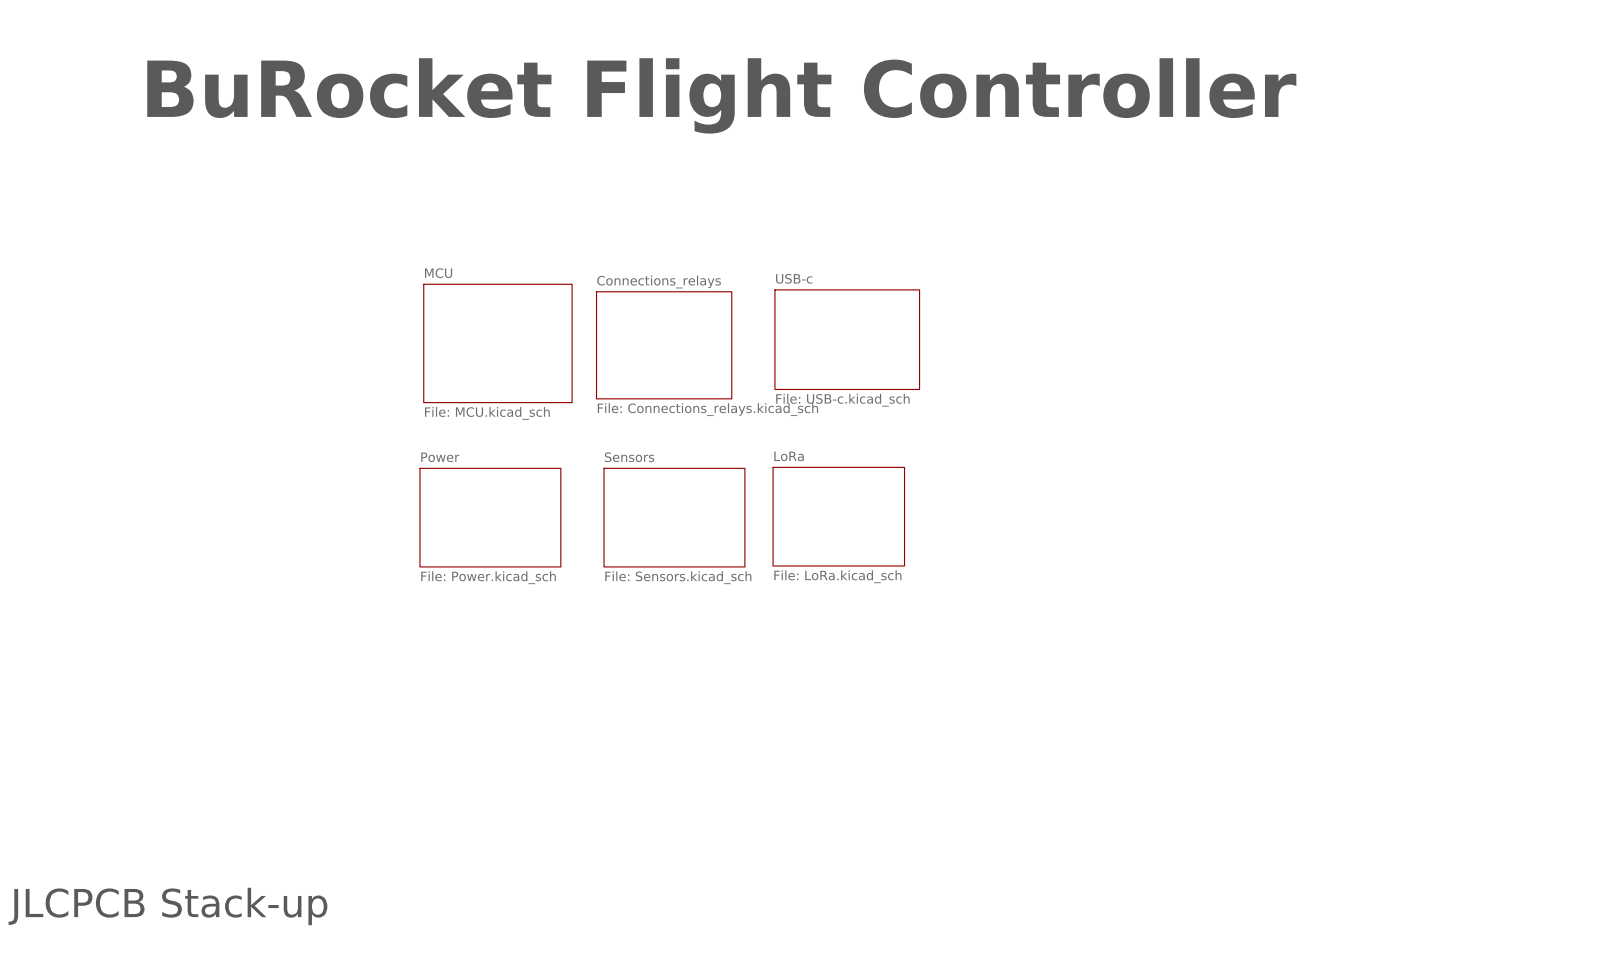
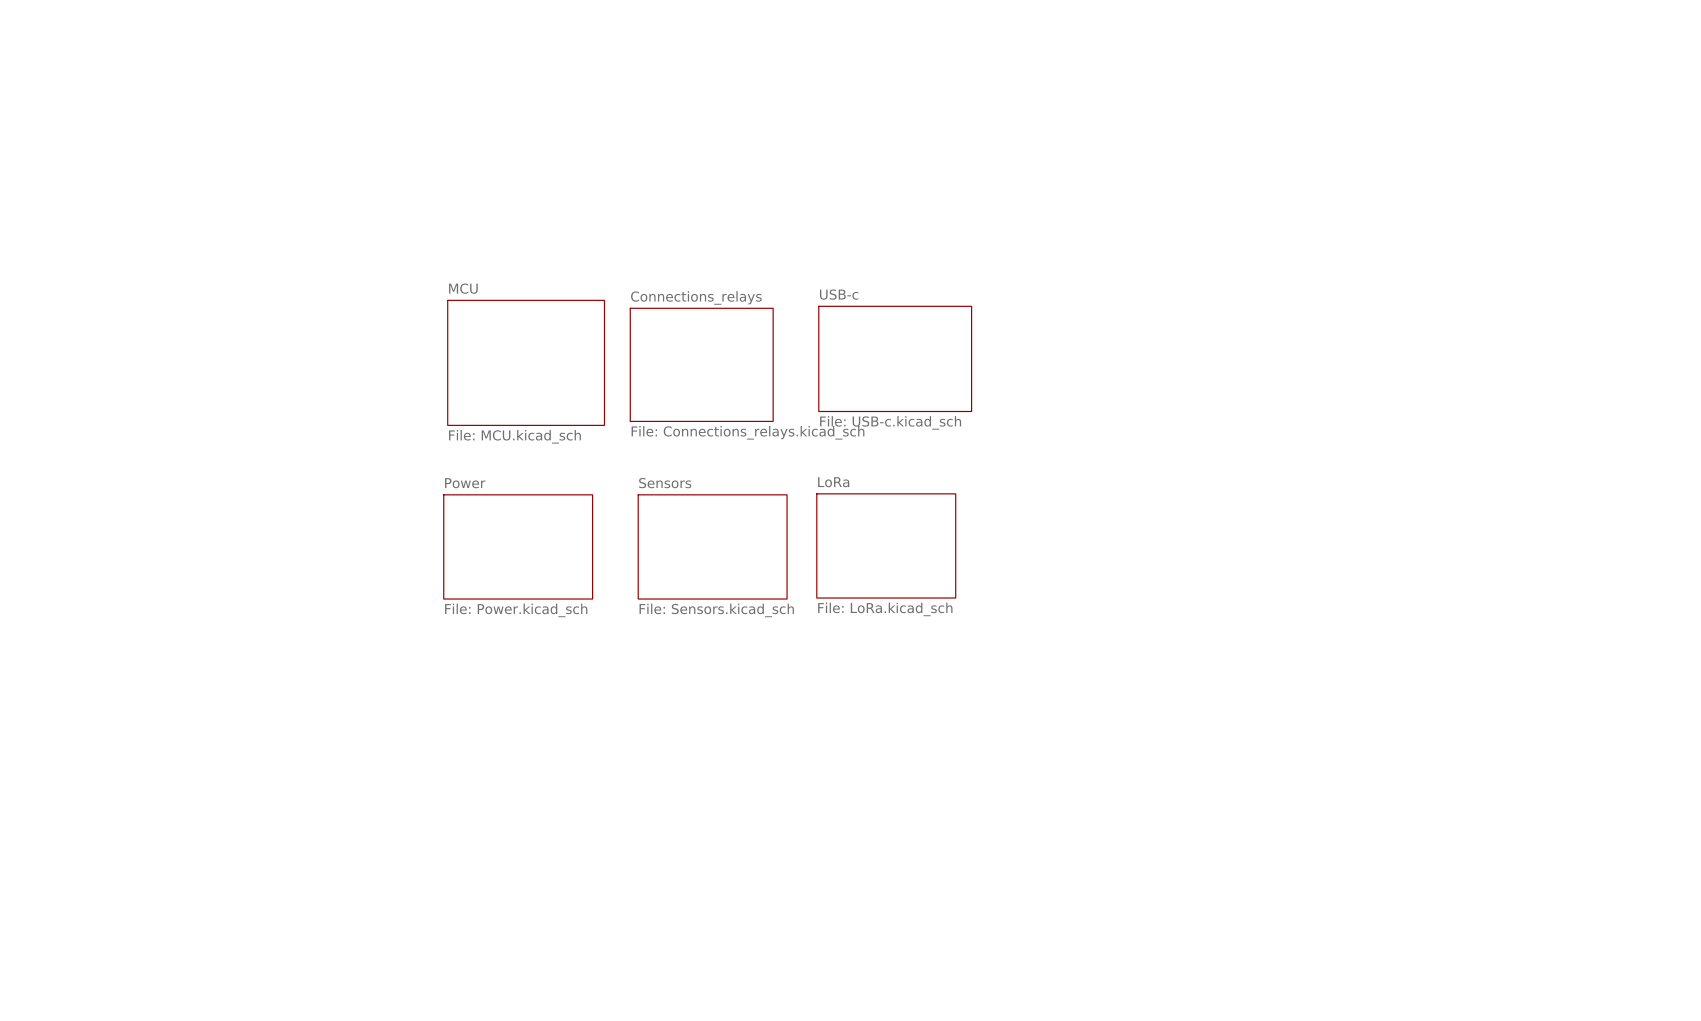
text: BuRocket Flight Controller (721, 95) -> none
text: JLCPCB Stack-up (167, 906) -> none

